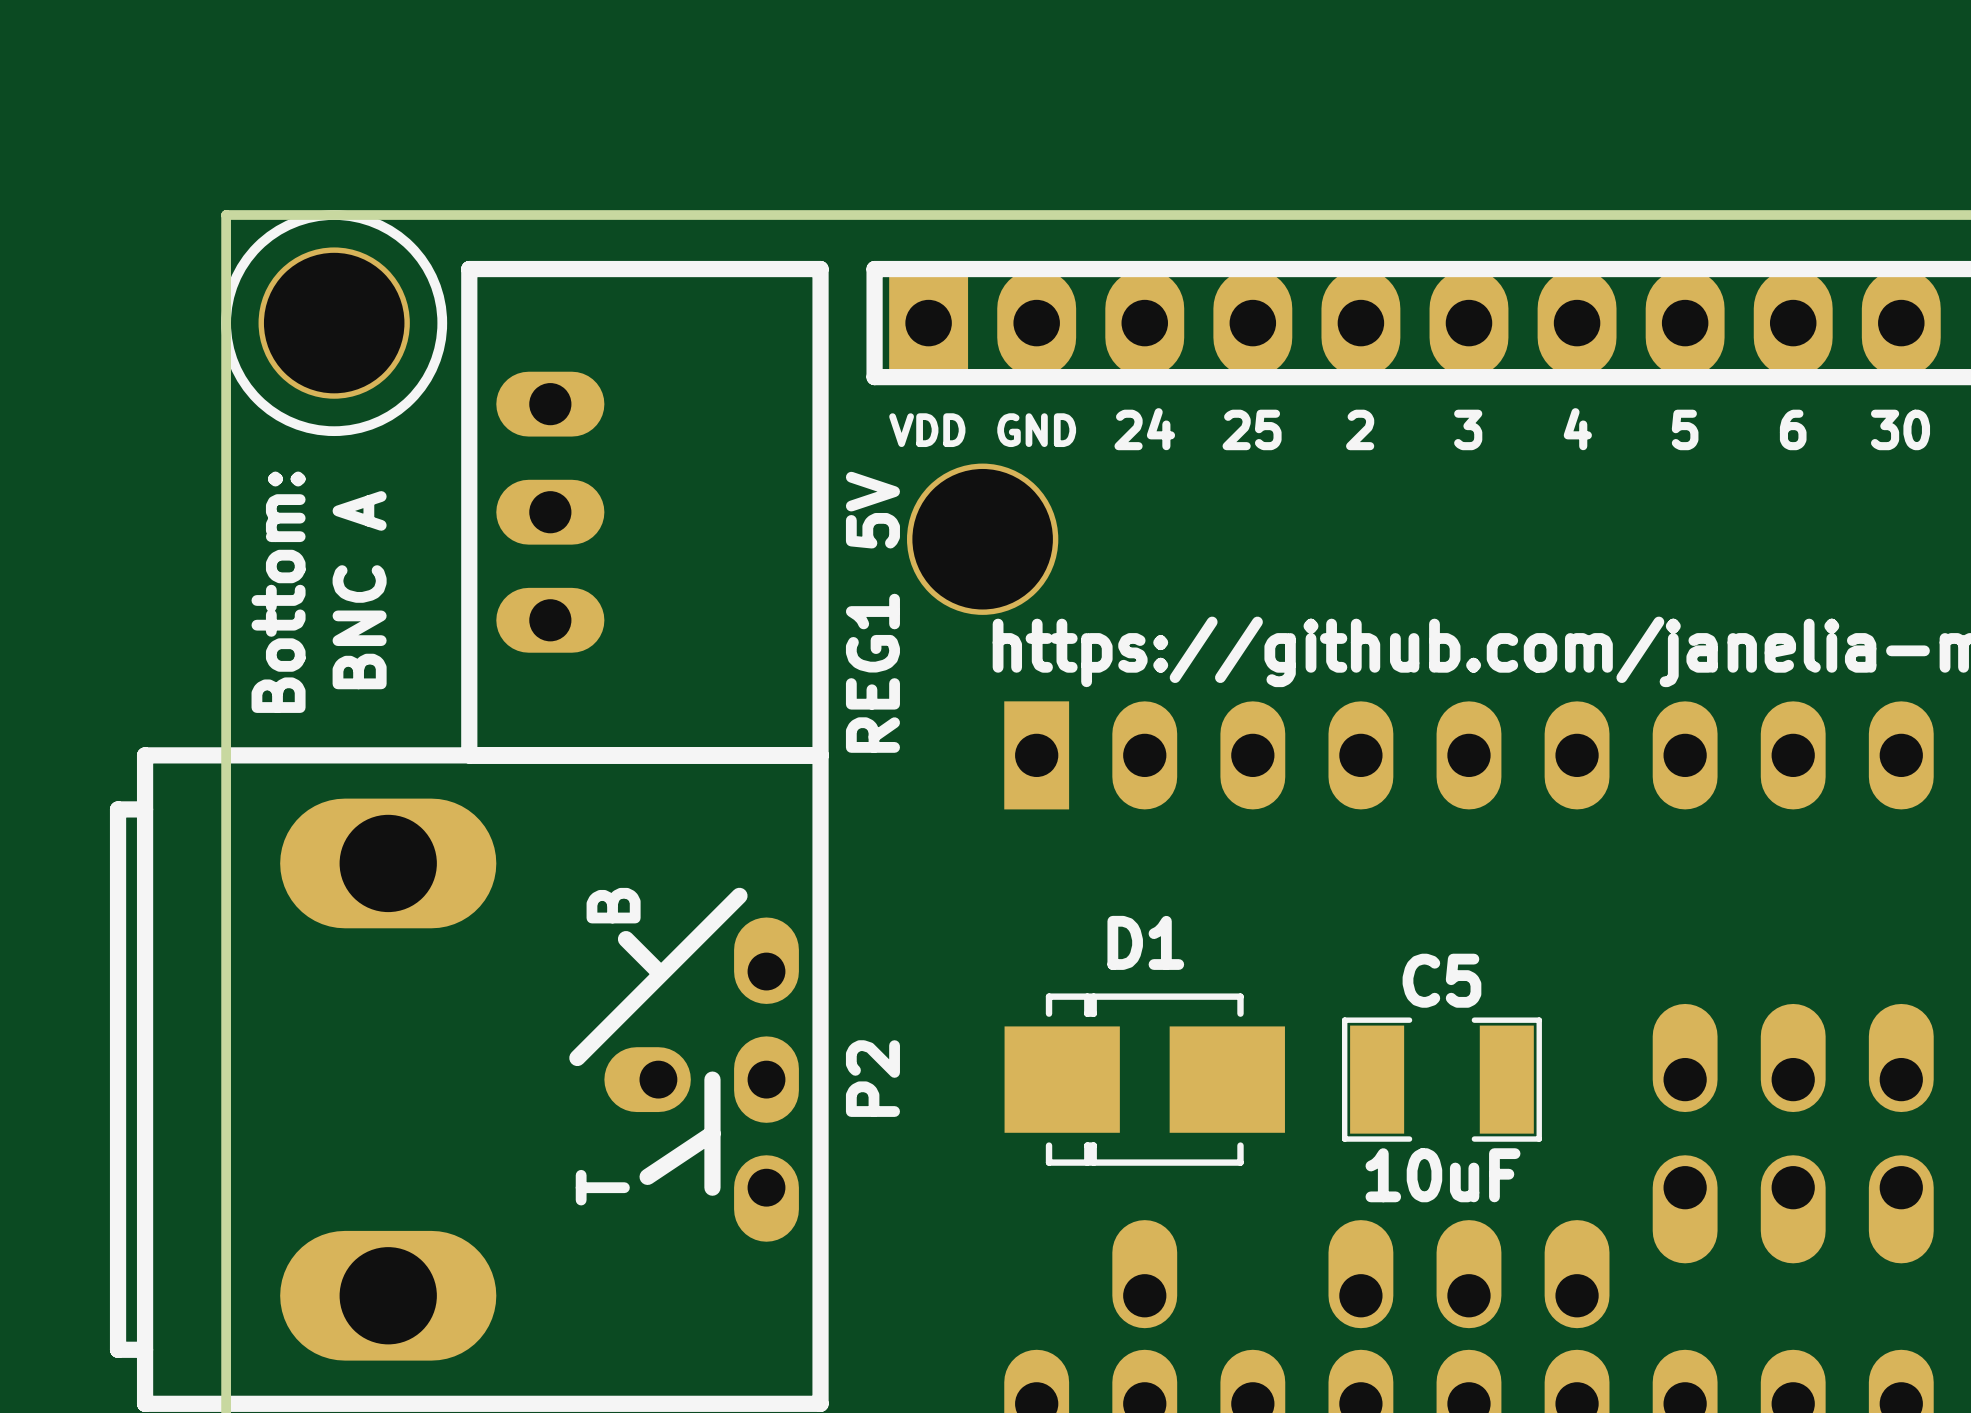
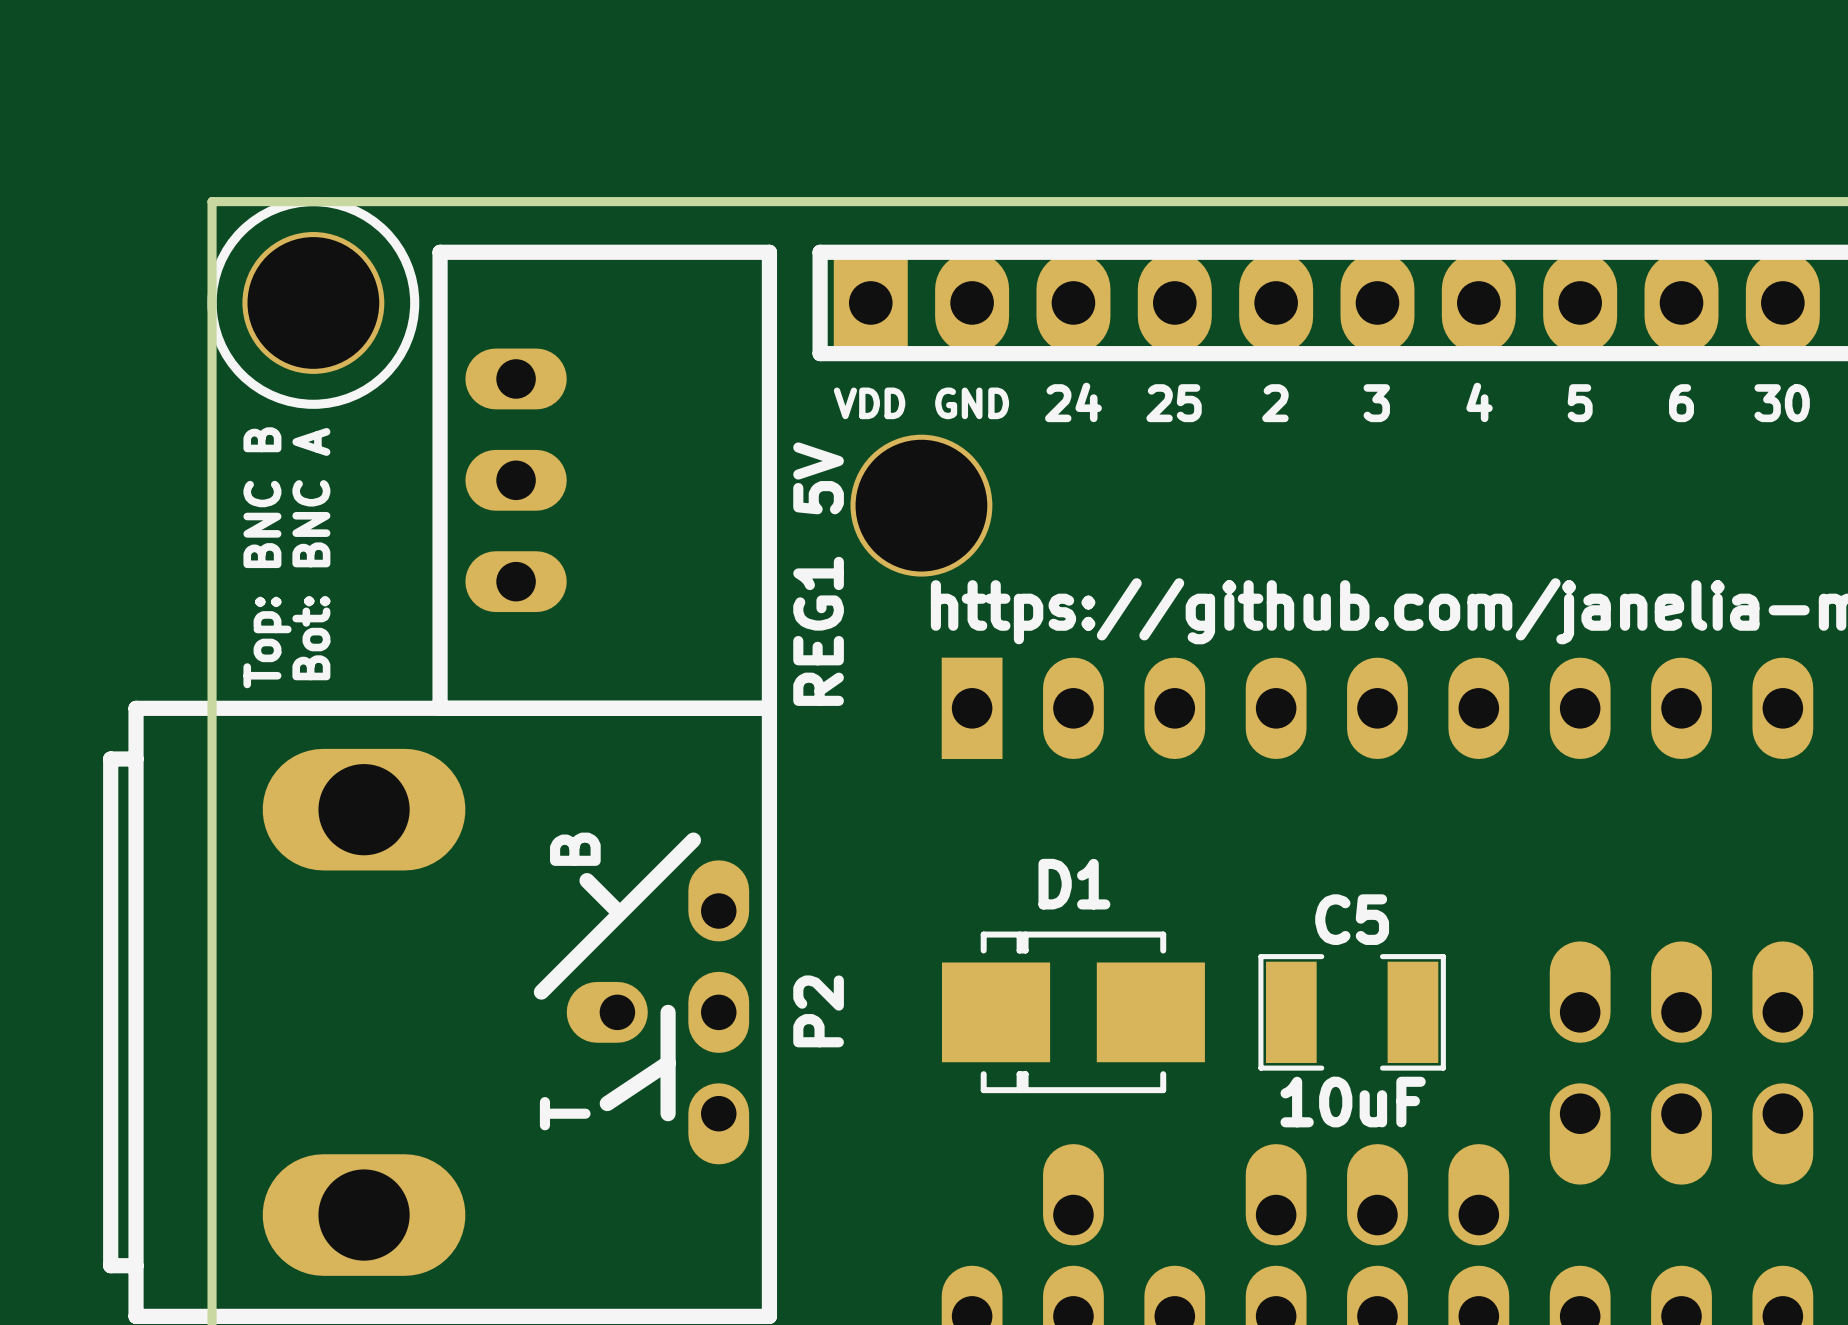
text: BNC A (359, 590) -> Bot: BNC A (311, 554)
text: Bottom: (278, 592) -> Top: BNC B (267, 557)

